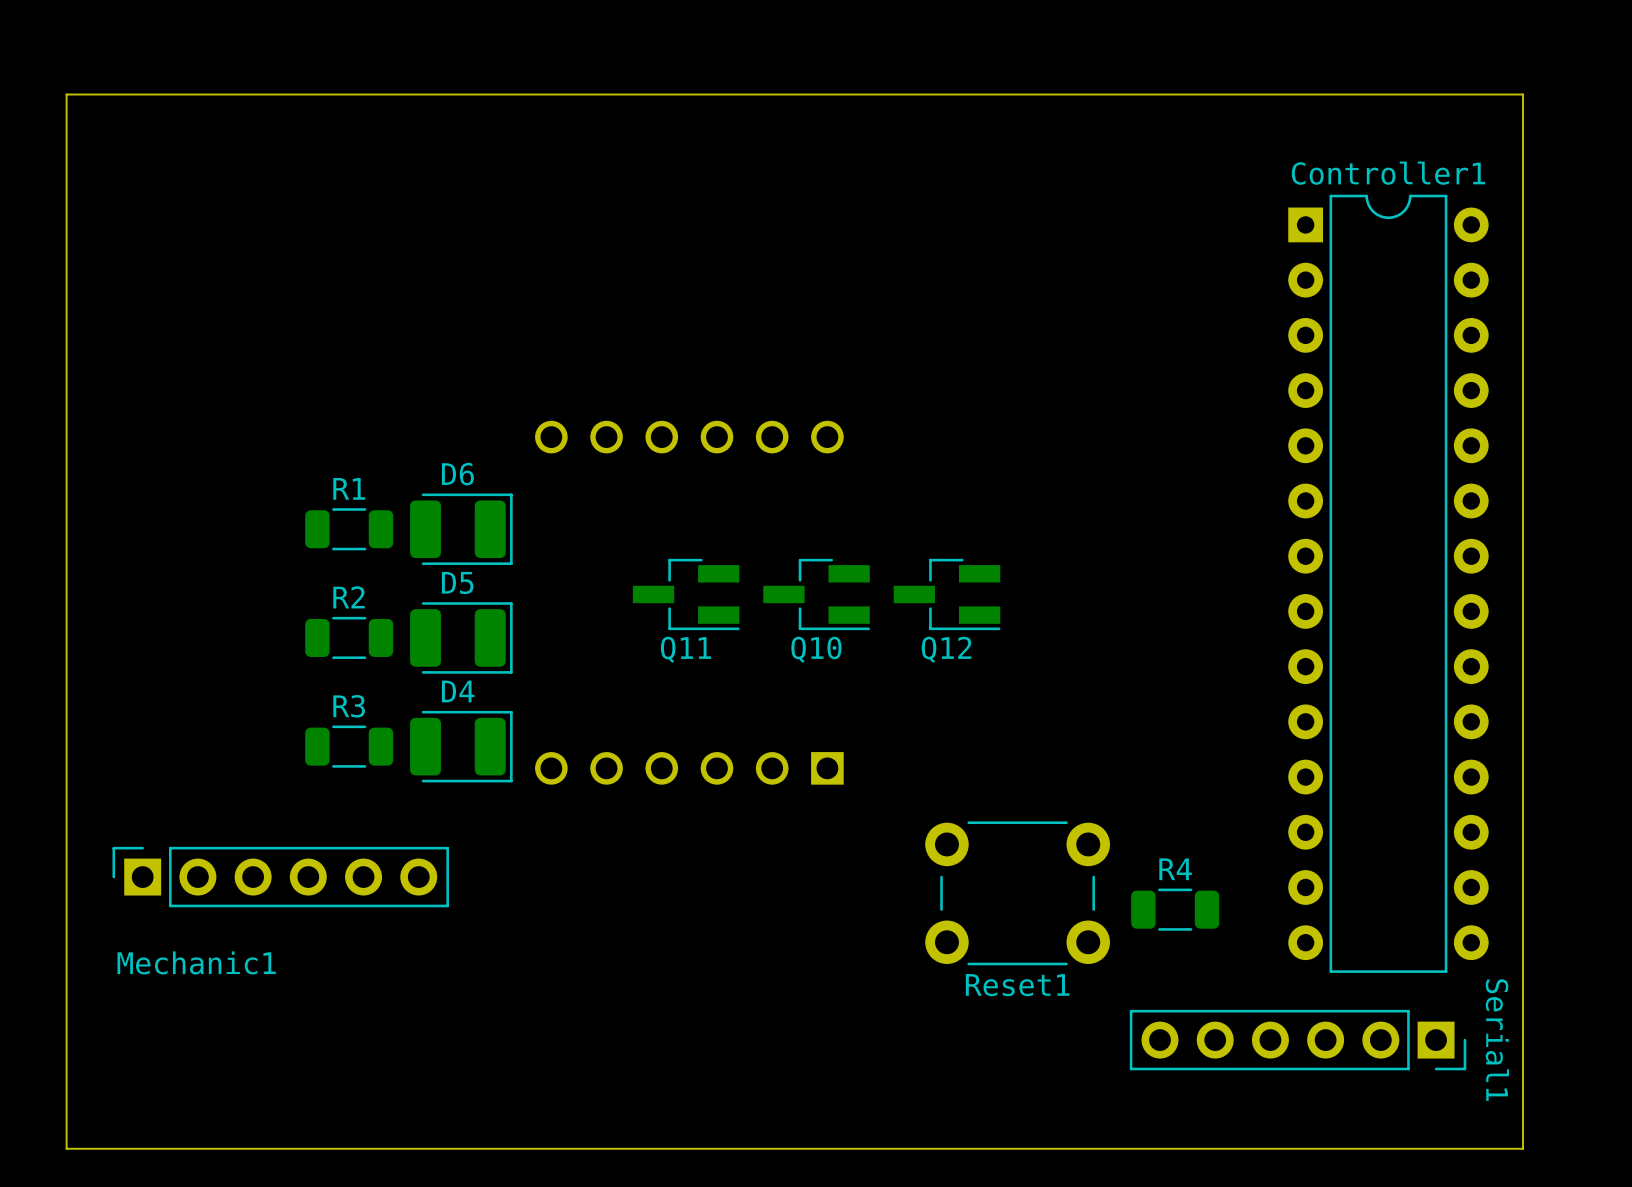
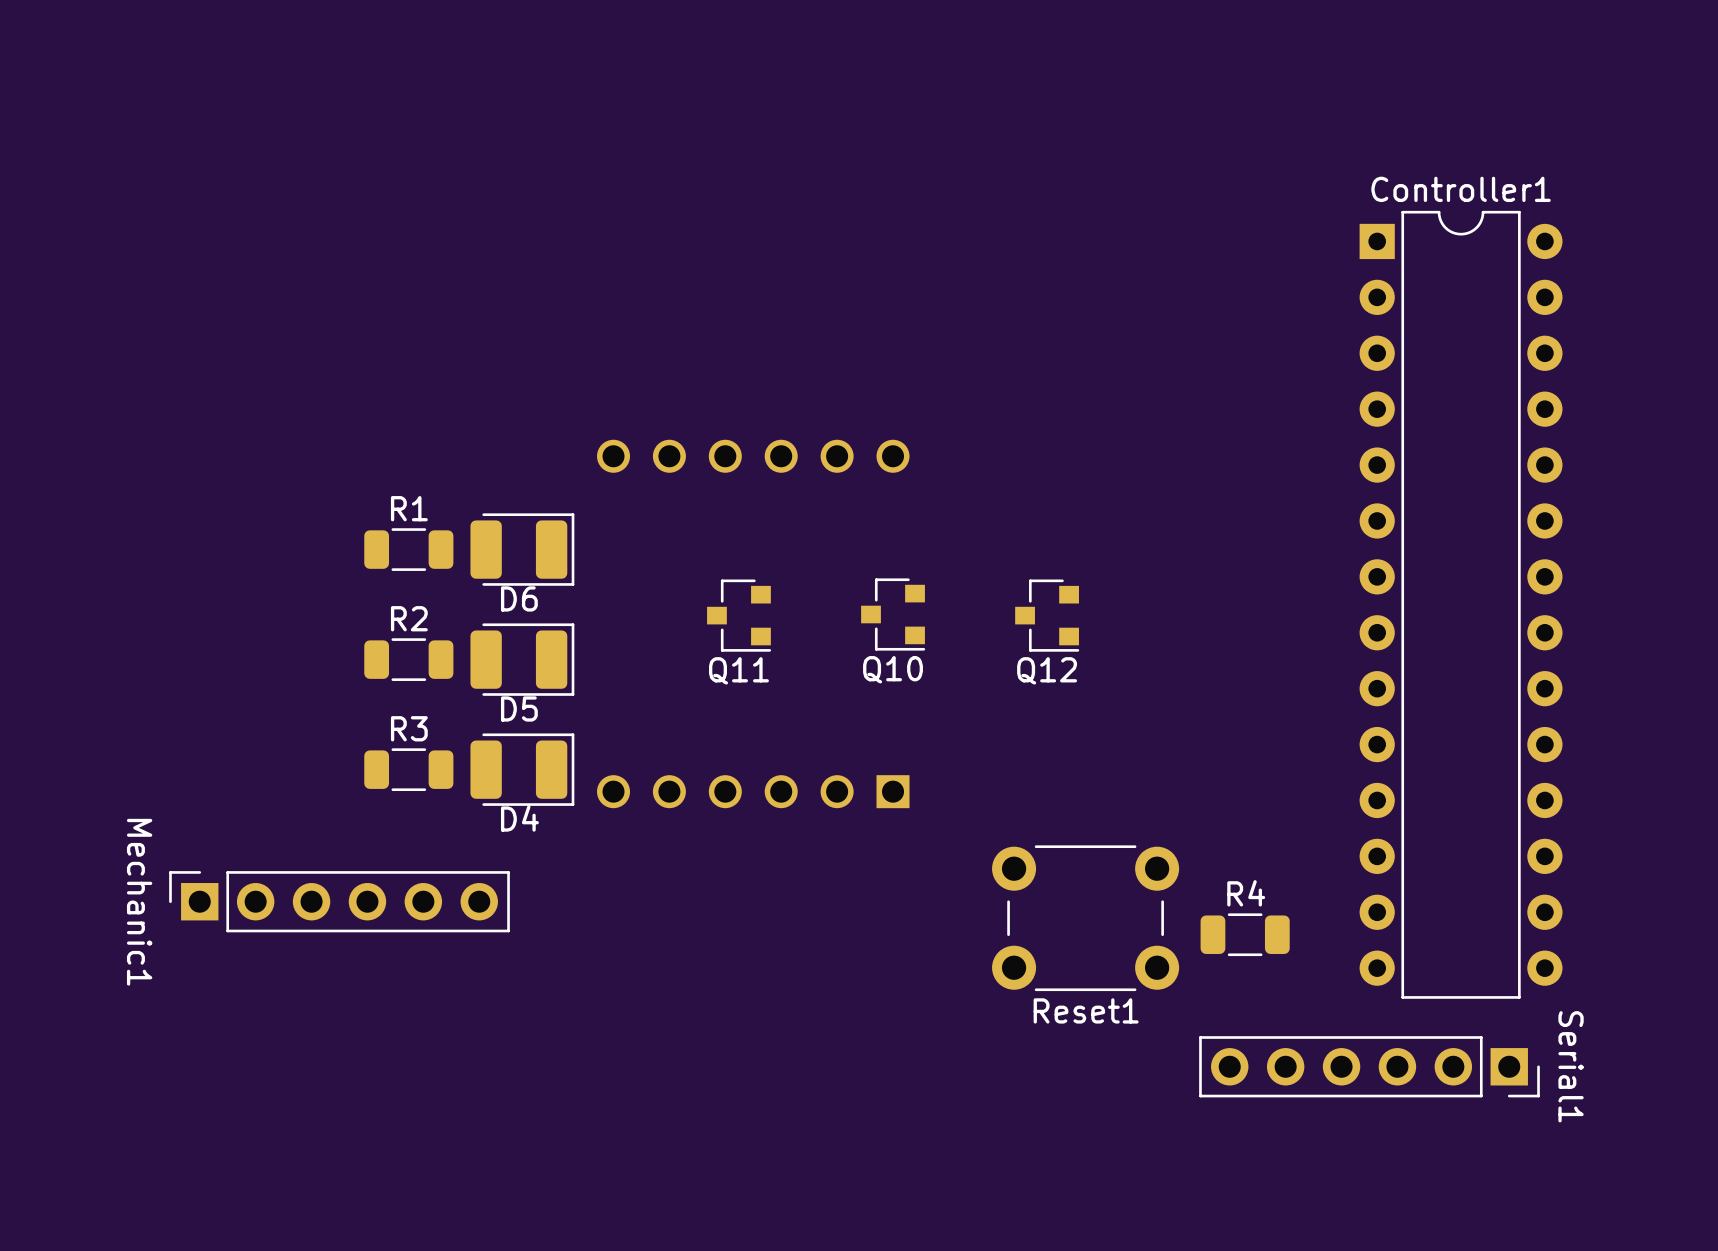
board edge: (1523, 94) (66, 94) (66, 1148) (1523, 1148) (1523, 94) -> none
D6 name position: D6 (457, 474) -> D6 (519, 598)
Q11 footprint: [632, 558, 740, 631] -> [707, 579, 772, 652]
Q10 footprint: [763, 558, 871, 631] -> [861, 578, 926, 651]
Q12 footprint: [893, 558, 1001, 631] -> [1015, 579, 1080, 652]
D5 name position: D5 (457, 583) -> D5 (519, 708)
D4 name position: D4 (458, 691) -> D4 (519, 818)
Mechanic1 name rotation: 0° (196, 962) -> 90° clockwise (139, 902)

